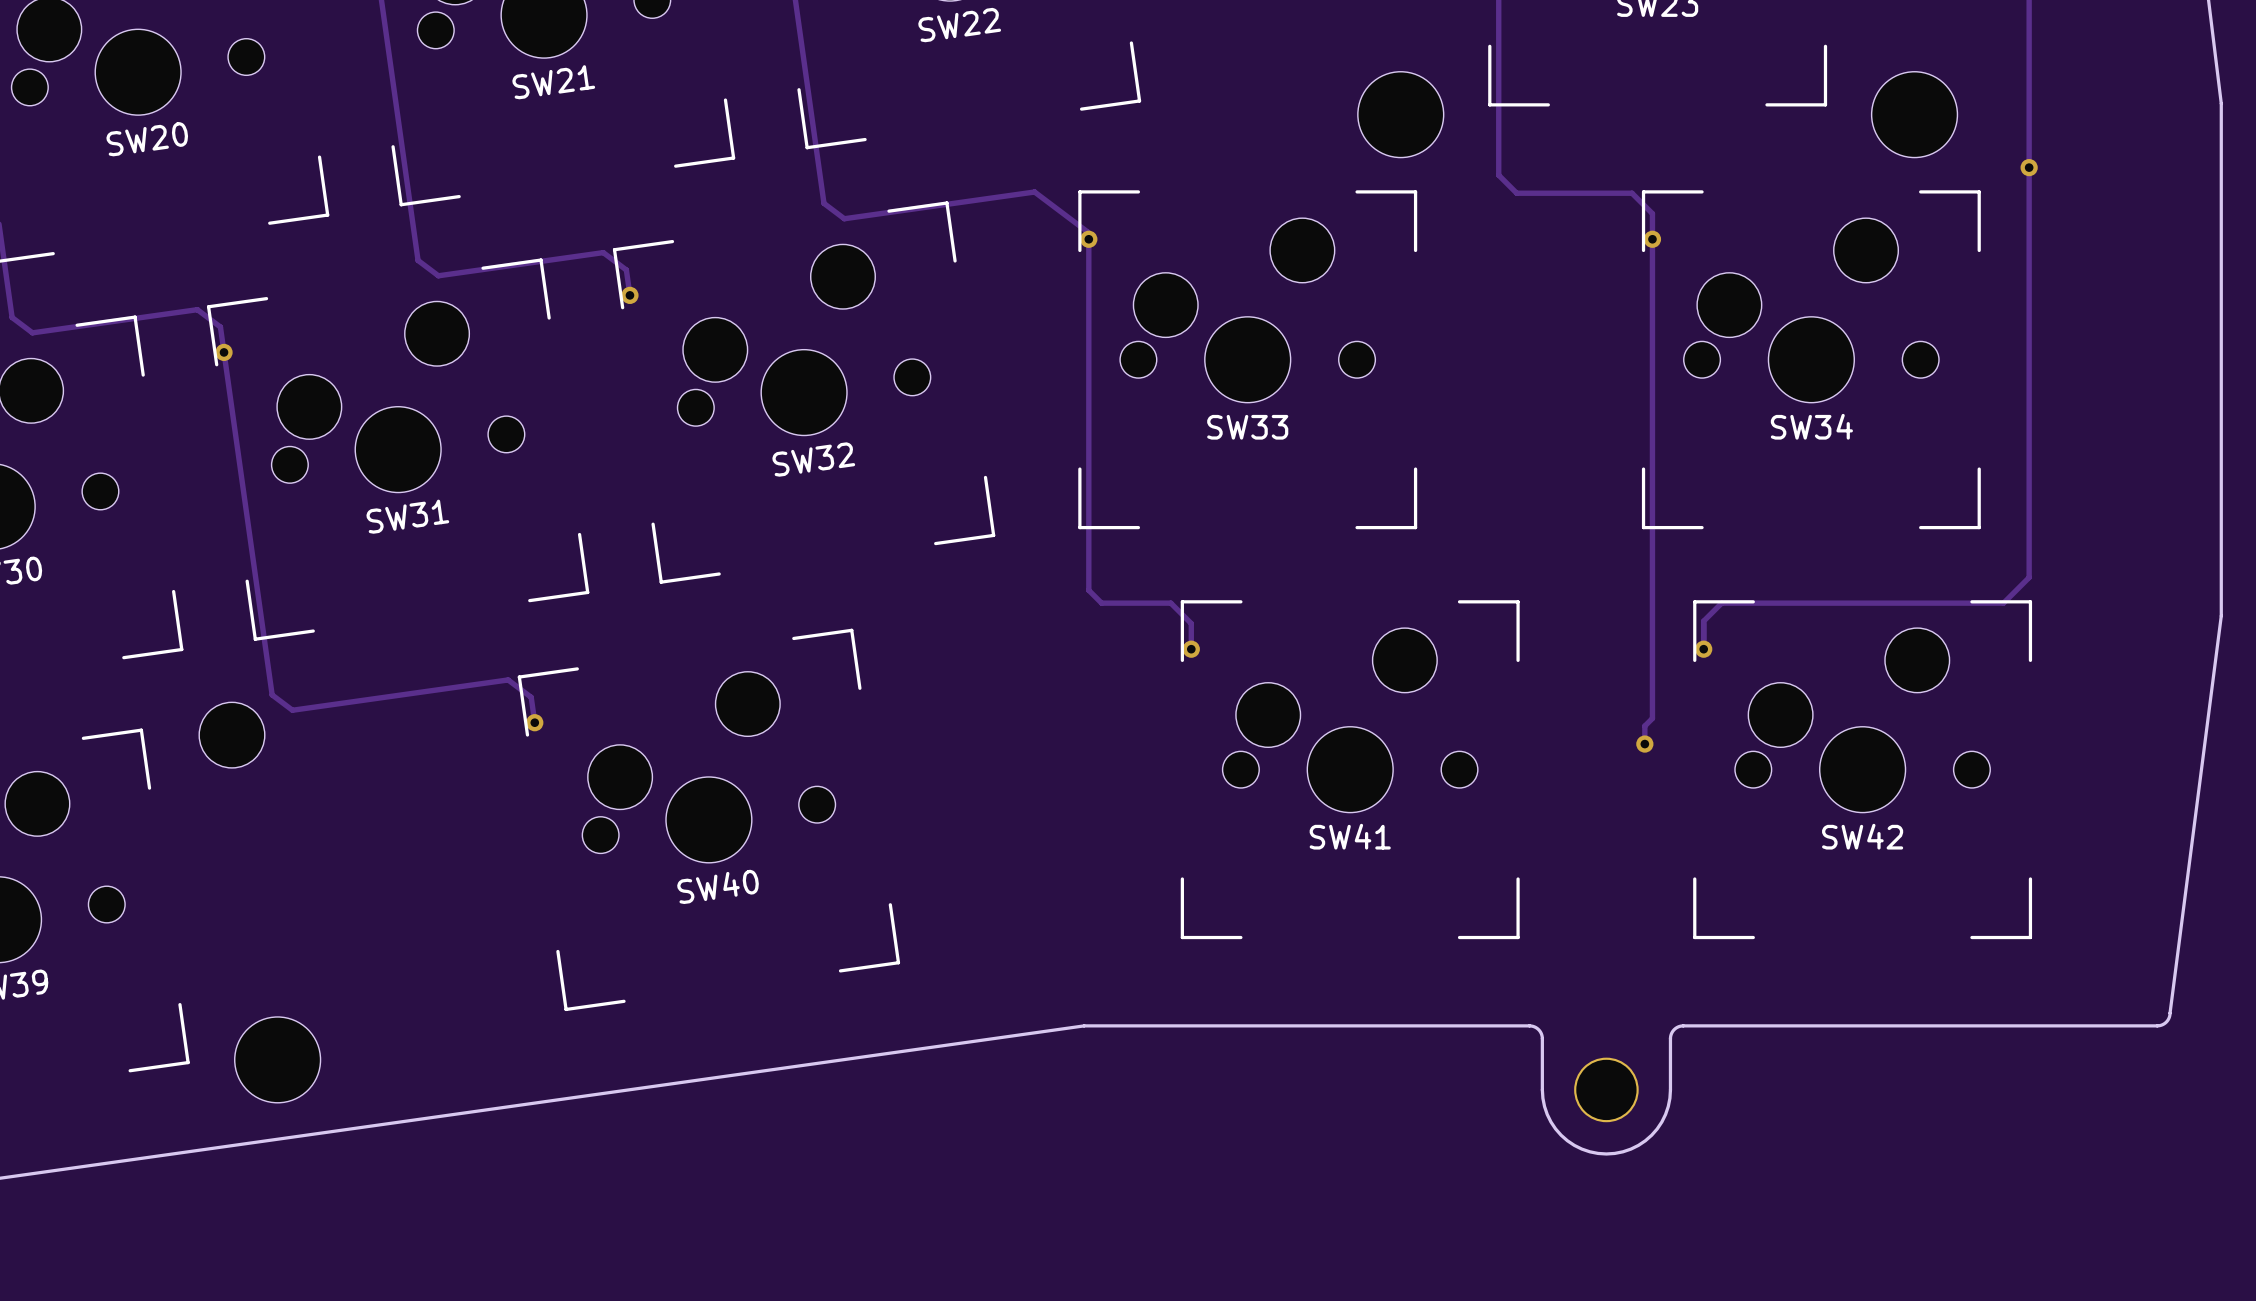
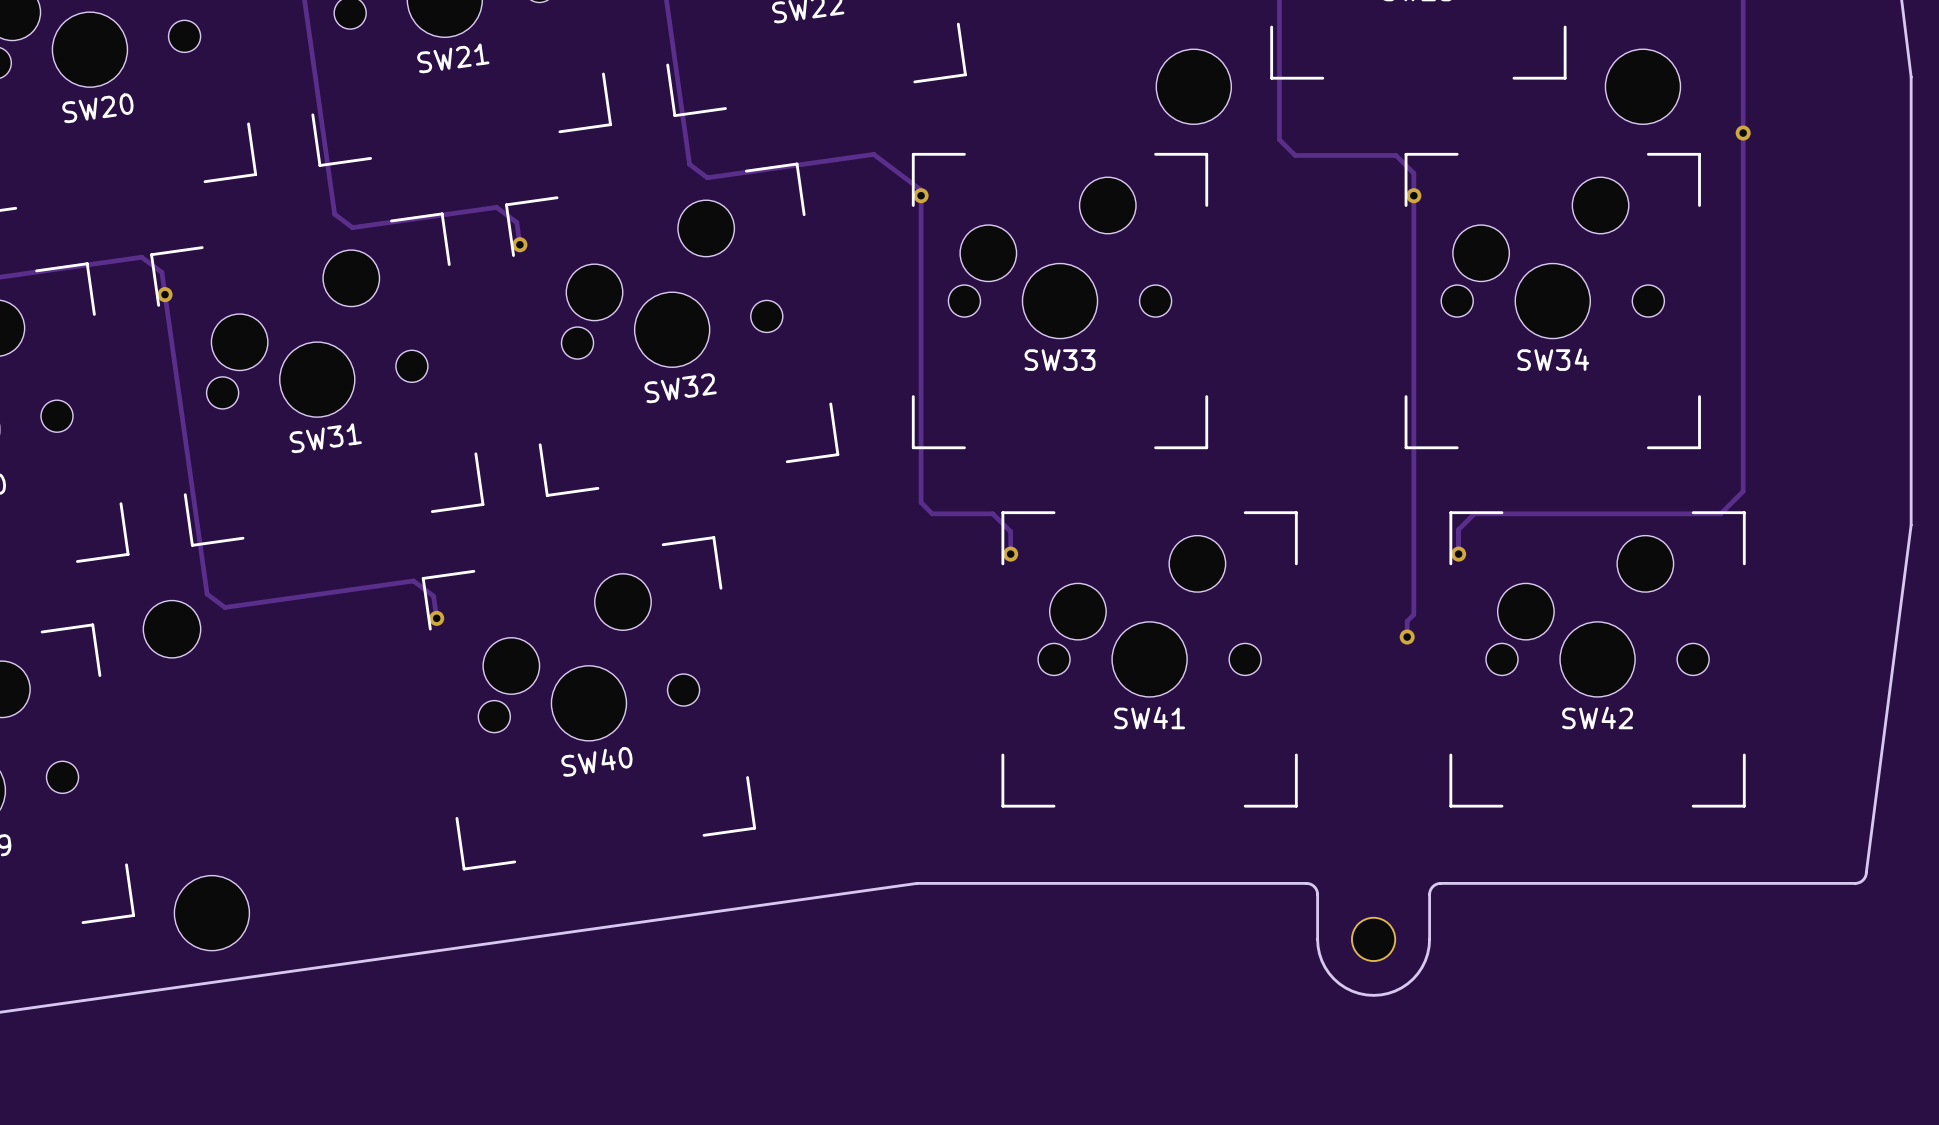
part footprint: [1574, 1057, 1639, 1123] -> [1351, 916, 1397, 962]

